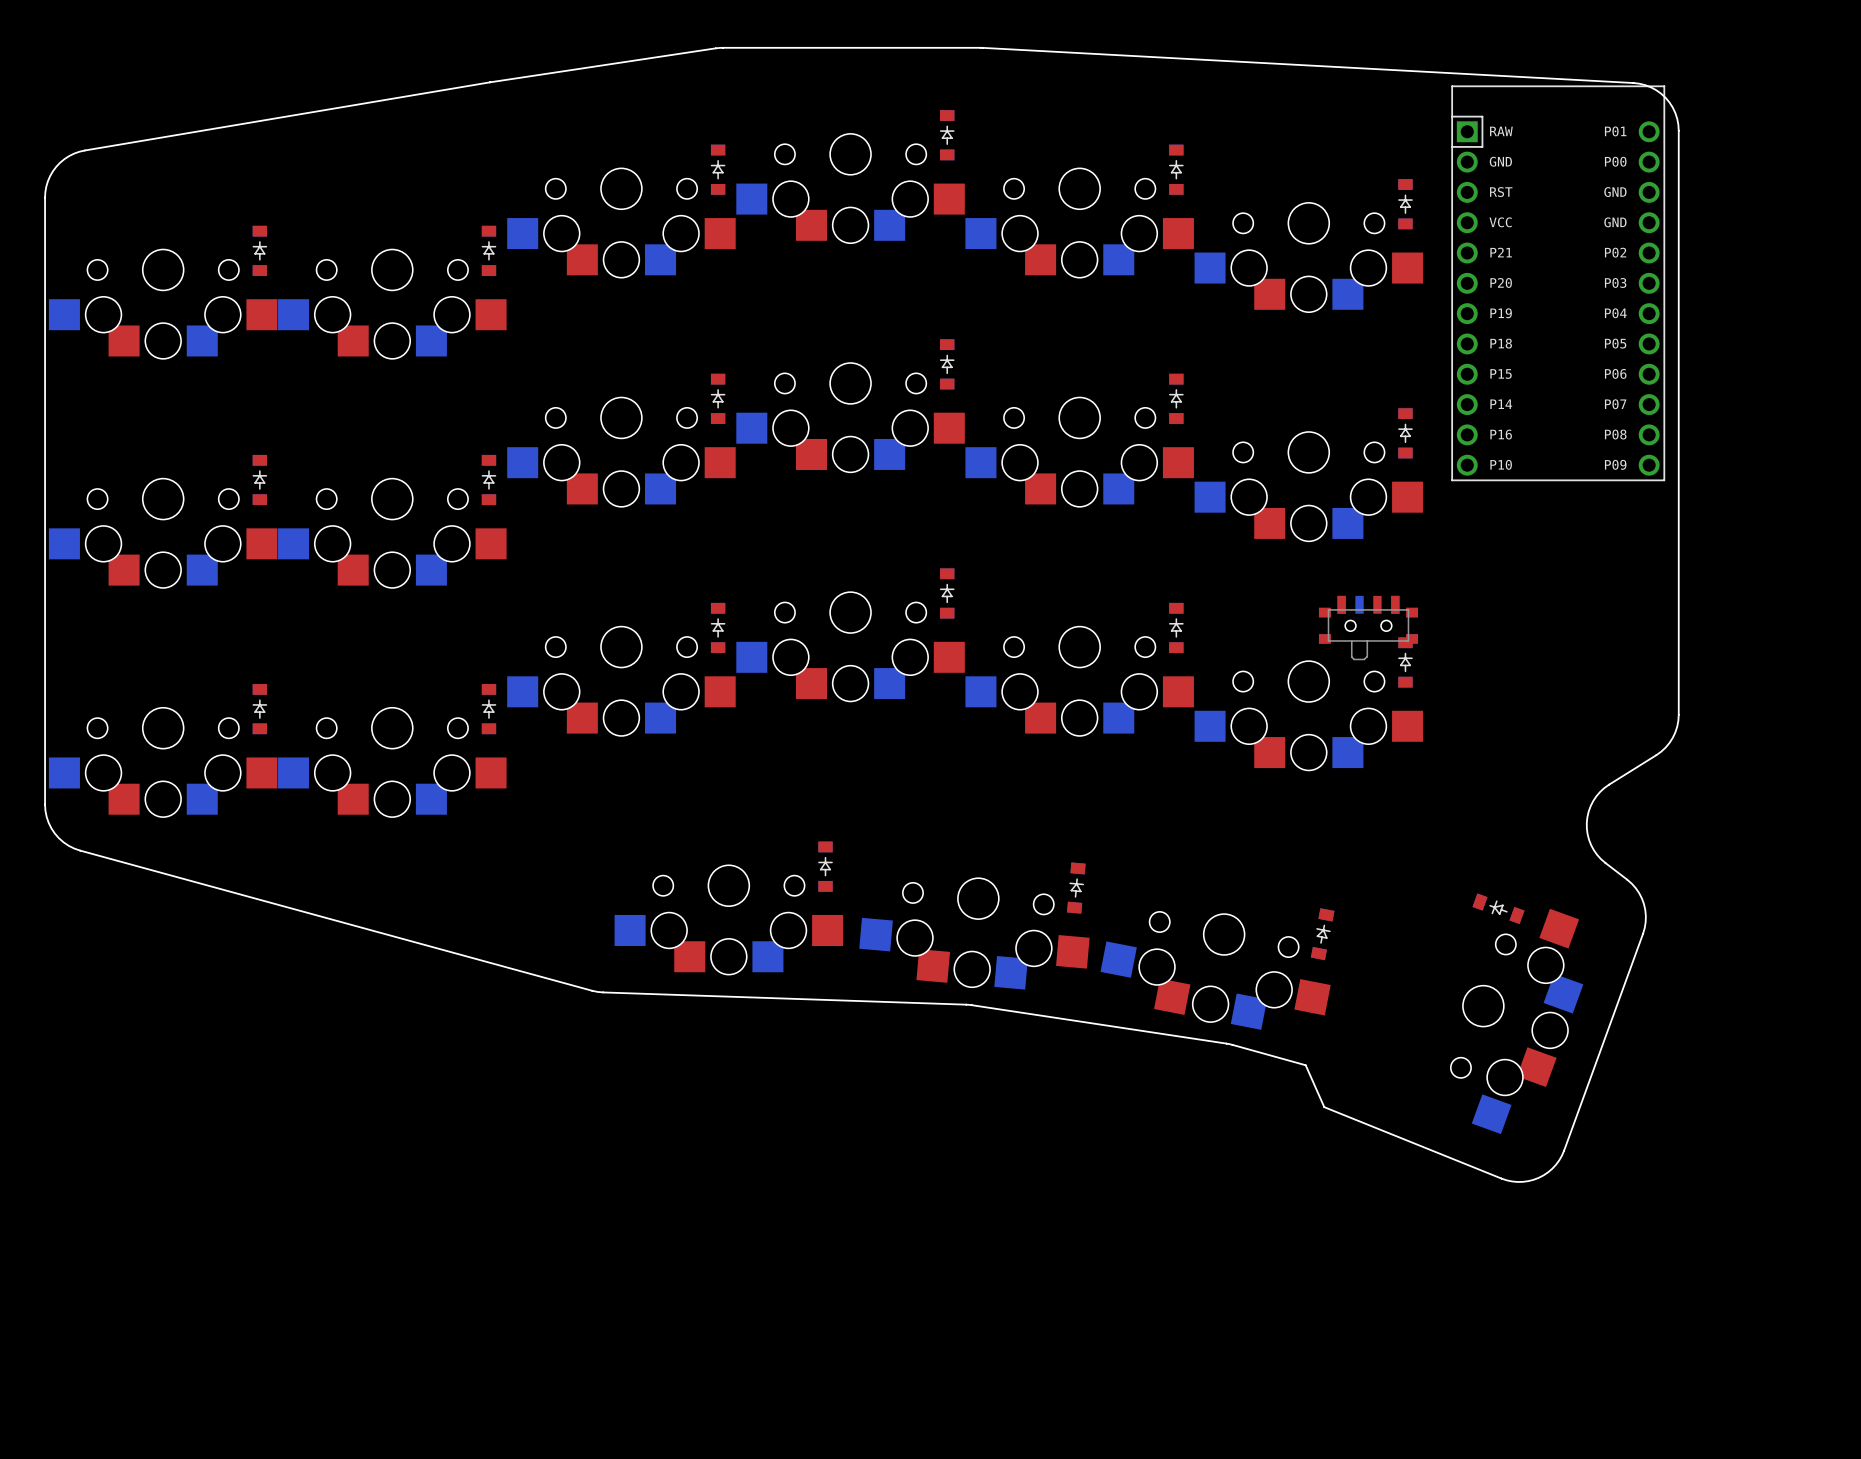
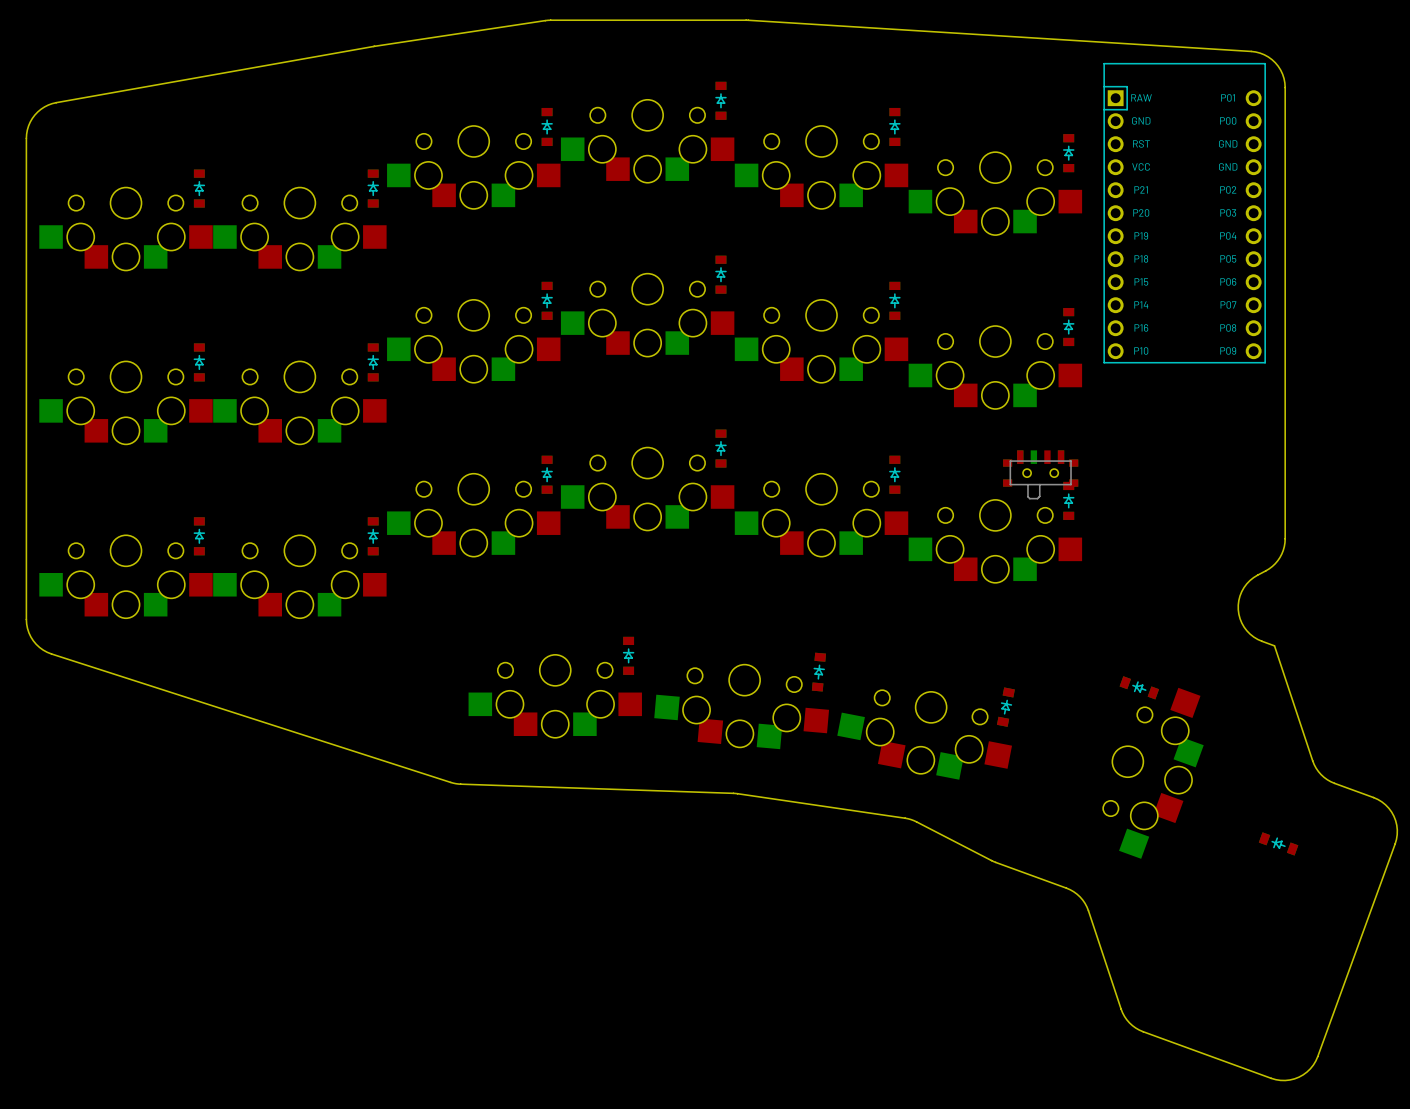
board edge: (722, 47) (981, 47) (1633, 83) (1645, 85) (1656, 90) (1669, 102) (1675, 113) (1678, 130) (1678, 720) (1672, 737) (1665, 747) (1604, 787) (1596, 796) (1588, 811) (1586, 828) (1591, 845) (1601, 859) (1635, 888) (1643, 904) (1645, 922) (1564, 1150) (1559, 1160) (1548, 1172) (1538, 1177) (1522, 1181) (1501, 1178) (1324, 1107) (1305, 1065) (1229, 1044) (969, 1004) (597, 991) (80, 850) (63, 842) (54, 833) (46, 816) (45, 804) (45, 197) (47, 181) (56, 166) (69, 156) (84, 150) (490, 82) (722, 47) -> (550, 20) (374, 46) (56, 102) (44, 106) (34, 115) (28, 125) (26, 138) (26, 619) (27, 628) (33, 640) (39, 647) (51, 653) (455, 783) (735, 793) (911, 819) (993, 861) (1066, 888) (1080, 896) (1088, 910) (1122, 1012) (1135, 1028) (1275, 1079) (1289, 1079) (1303, 1074) (1310, 1068) (1317, 1056) (1395, 843) (1397, 829) (1391, 812) (1381, 801) (1330, 781) (1318, 771) (1312, 760) (1274, 645) (1250, 634) (1241, 623) (1238, 614) (1238, 600) (1244, 587) (1253, 577) (1275, 563) (1281, 554) (1284, 542) (1285, 87) (1282, 74) (1278, 66) (1264, 54) (1251, 51) (747, 20) (550, 20)
part: none -> (1278, 843)

